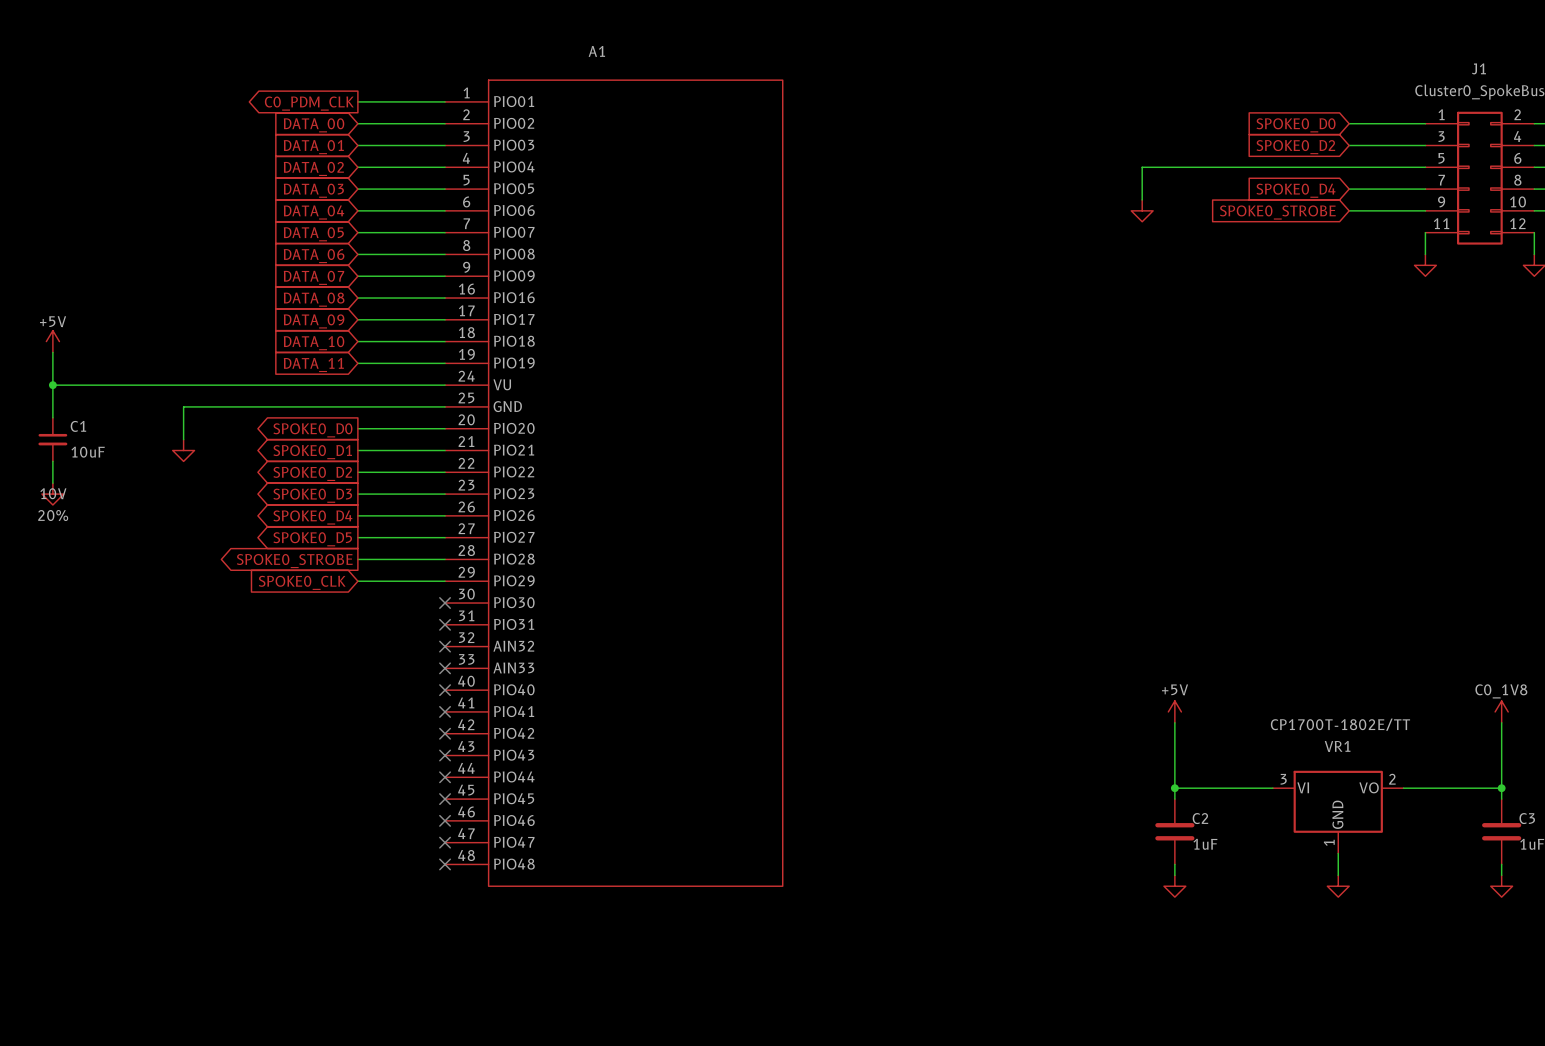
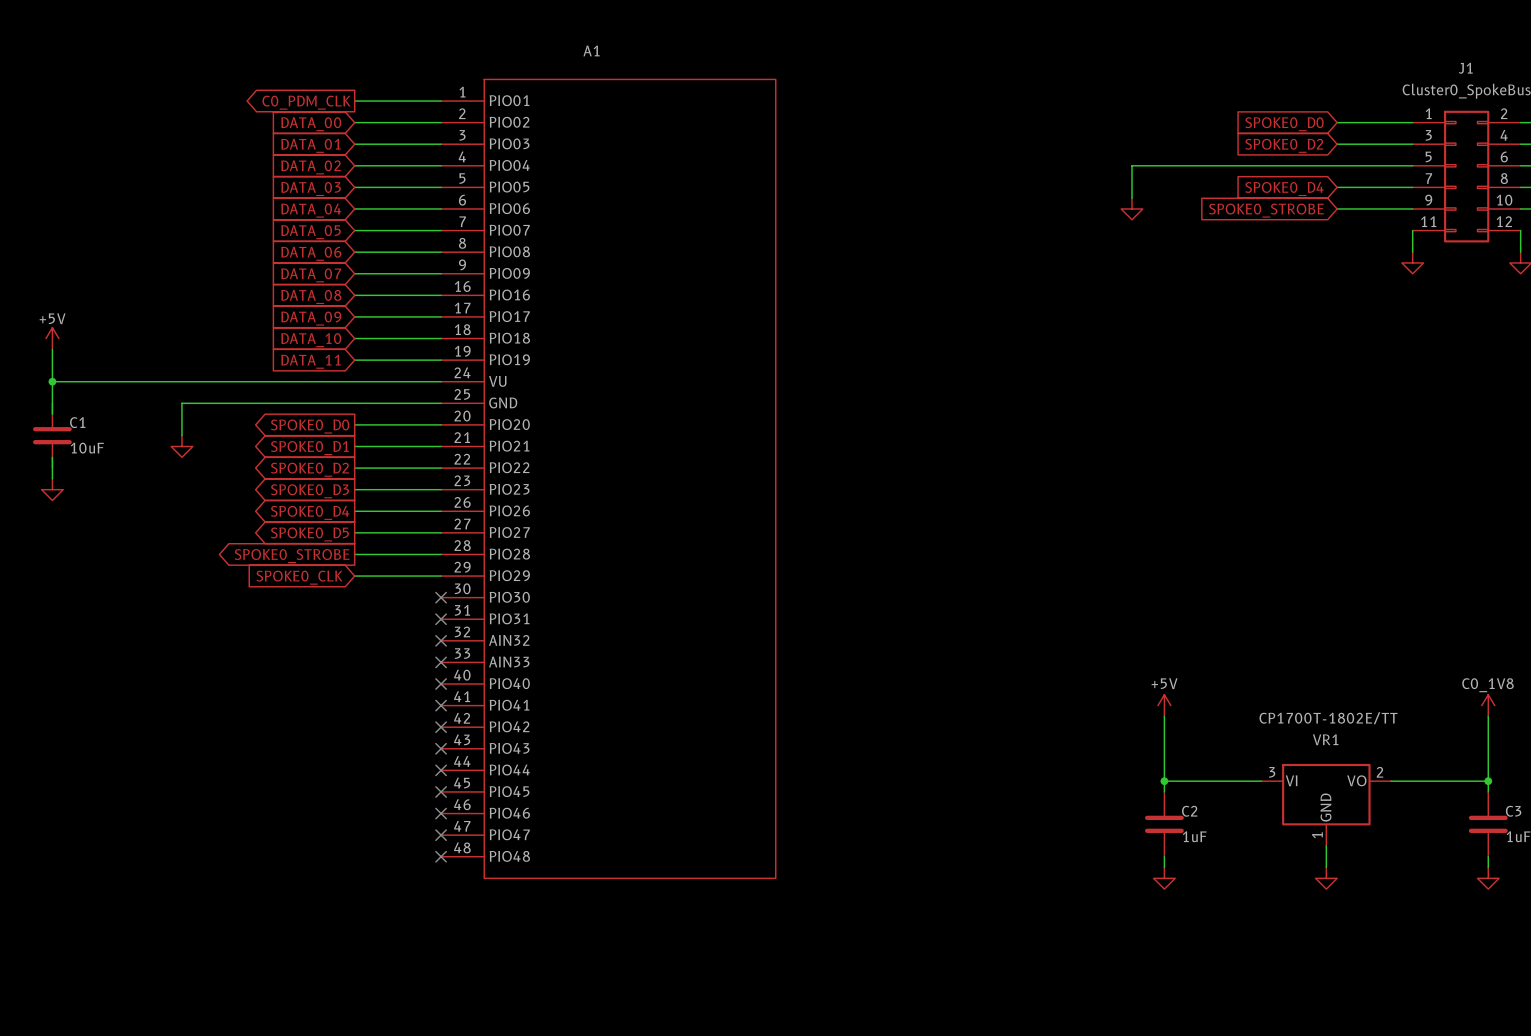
C1 symbol: [38, 417, 68, 462] -> [32, 403, 72, 469]
C1 text: 10V (53, 493) -> none
C1 text: 20% (53, 515) -> none

